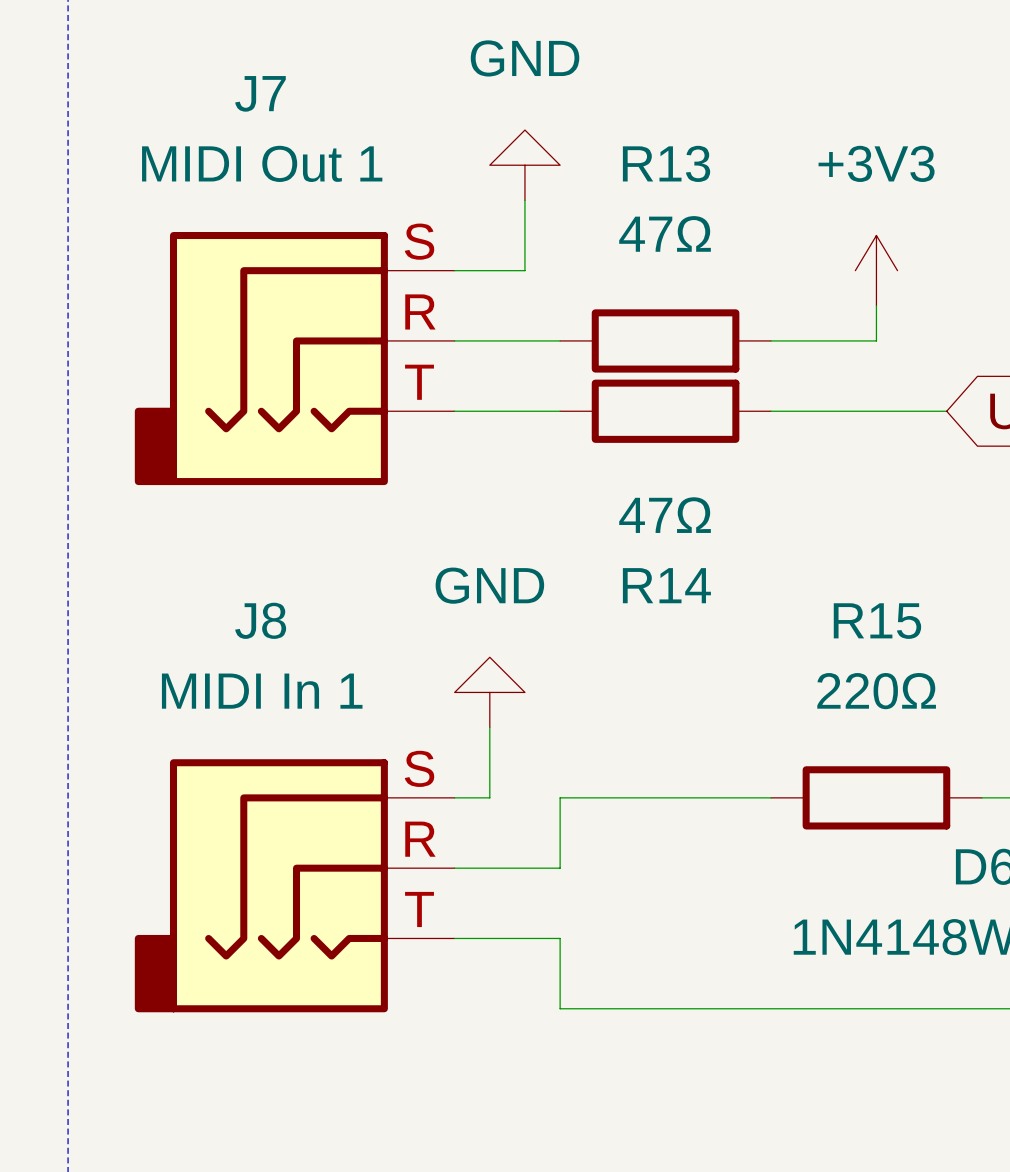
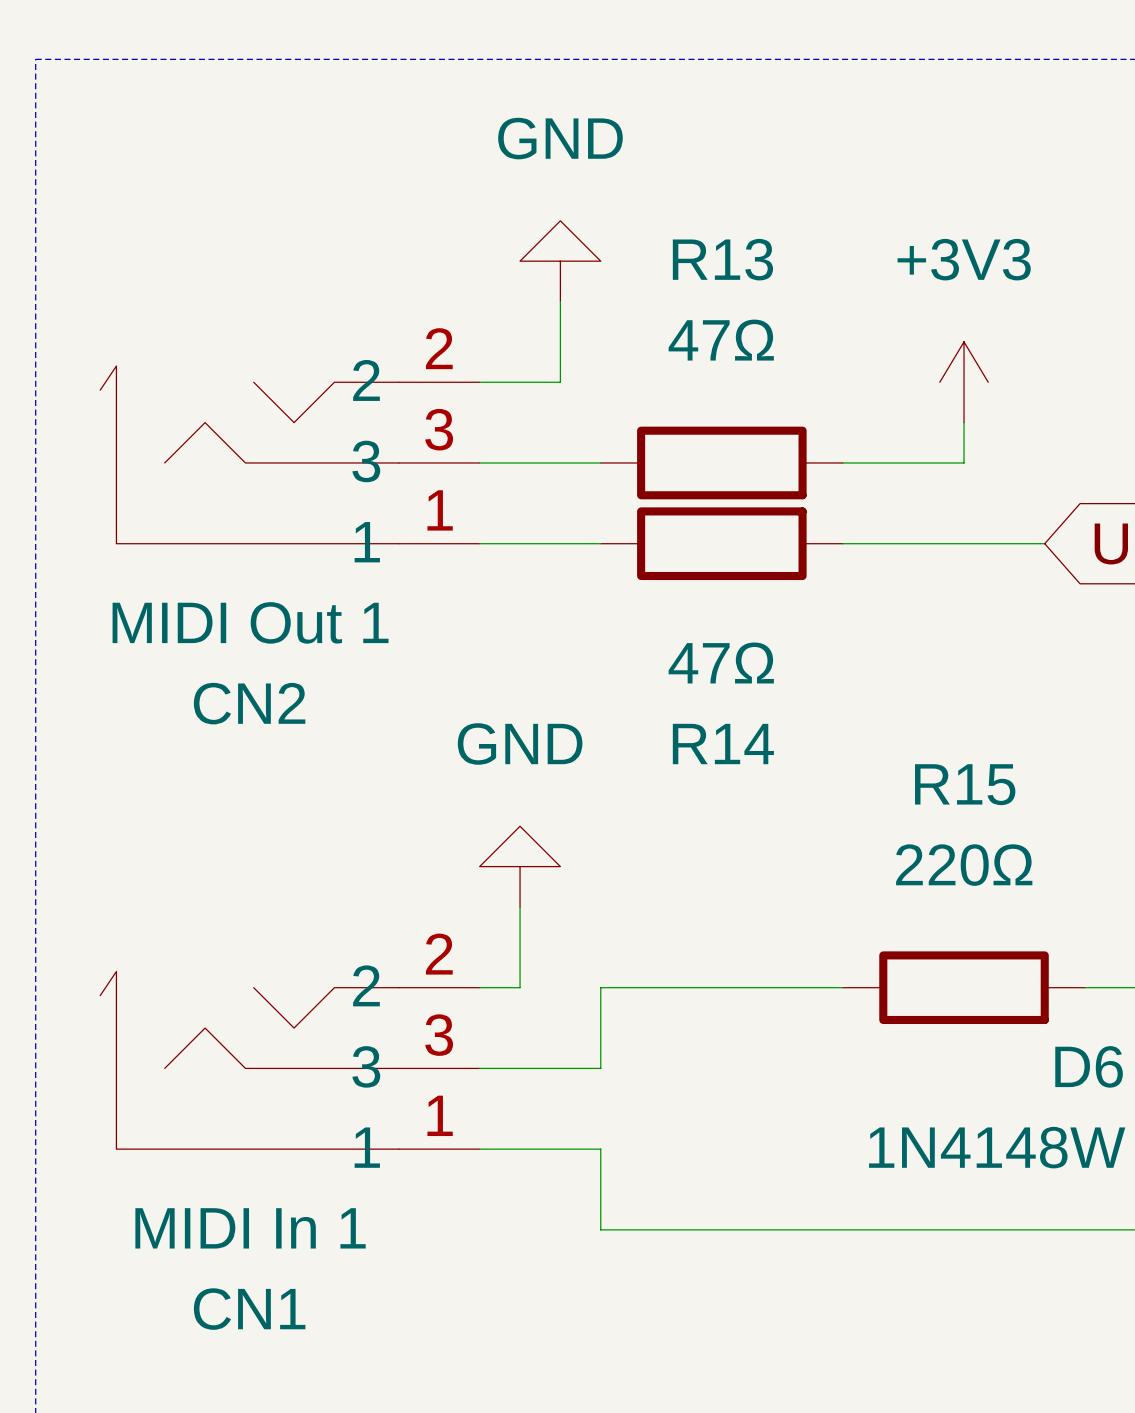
CN2: none -> MIDI Out 1 (289, 454)
J7: MIDI Out 1 (294, 358) -> none
CN1: none -> MIDI In 1 (289, 1060)
J8: MIDI In 1 (294, 885) -> none

